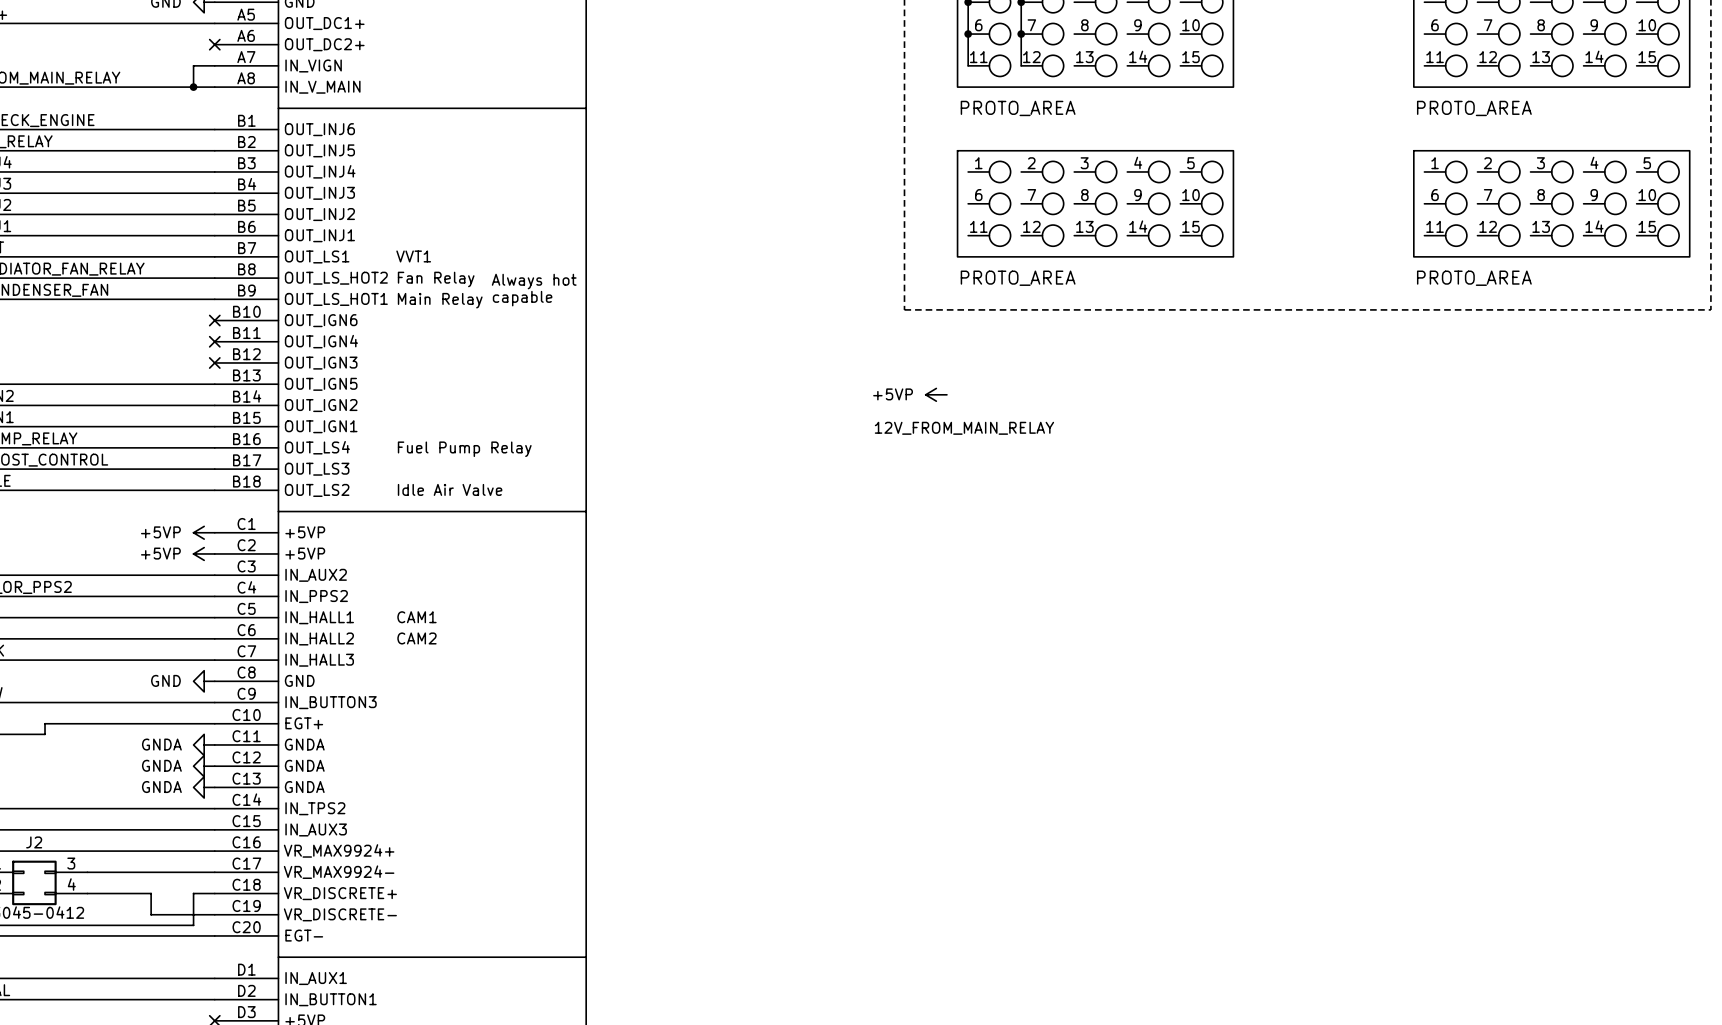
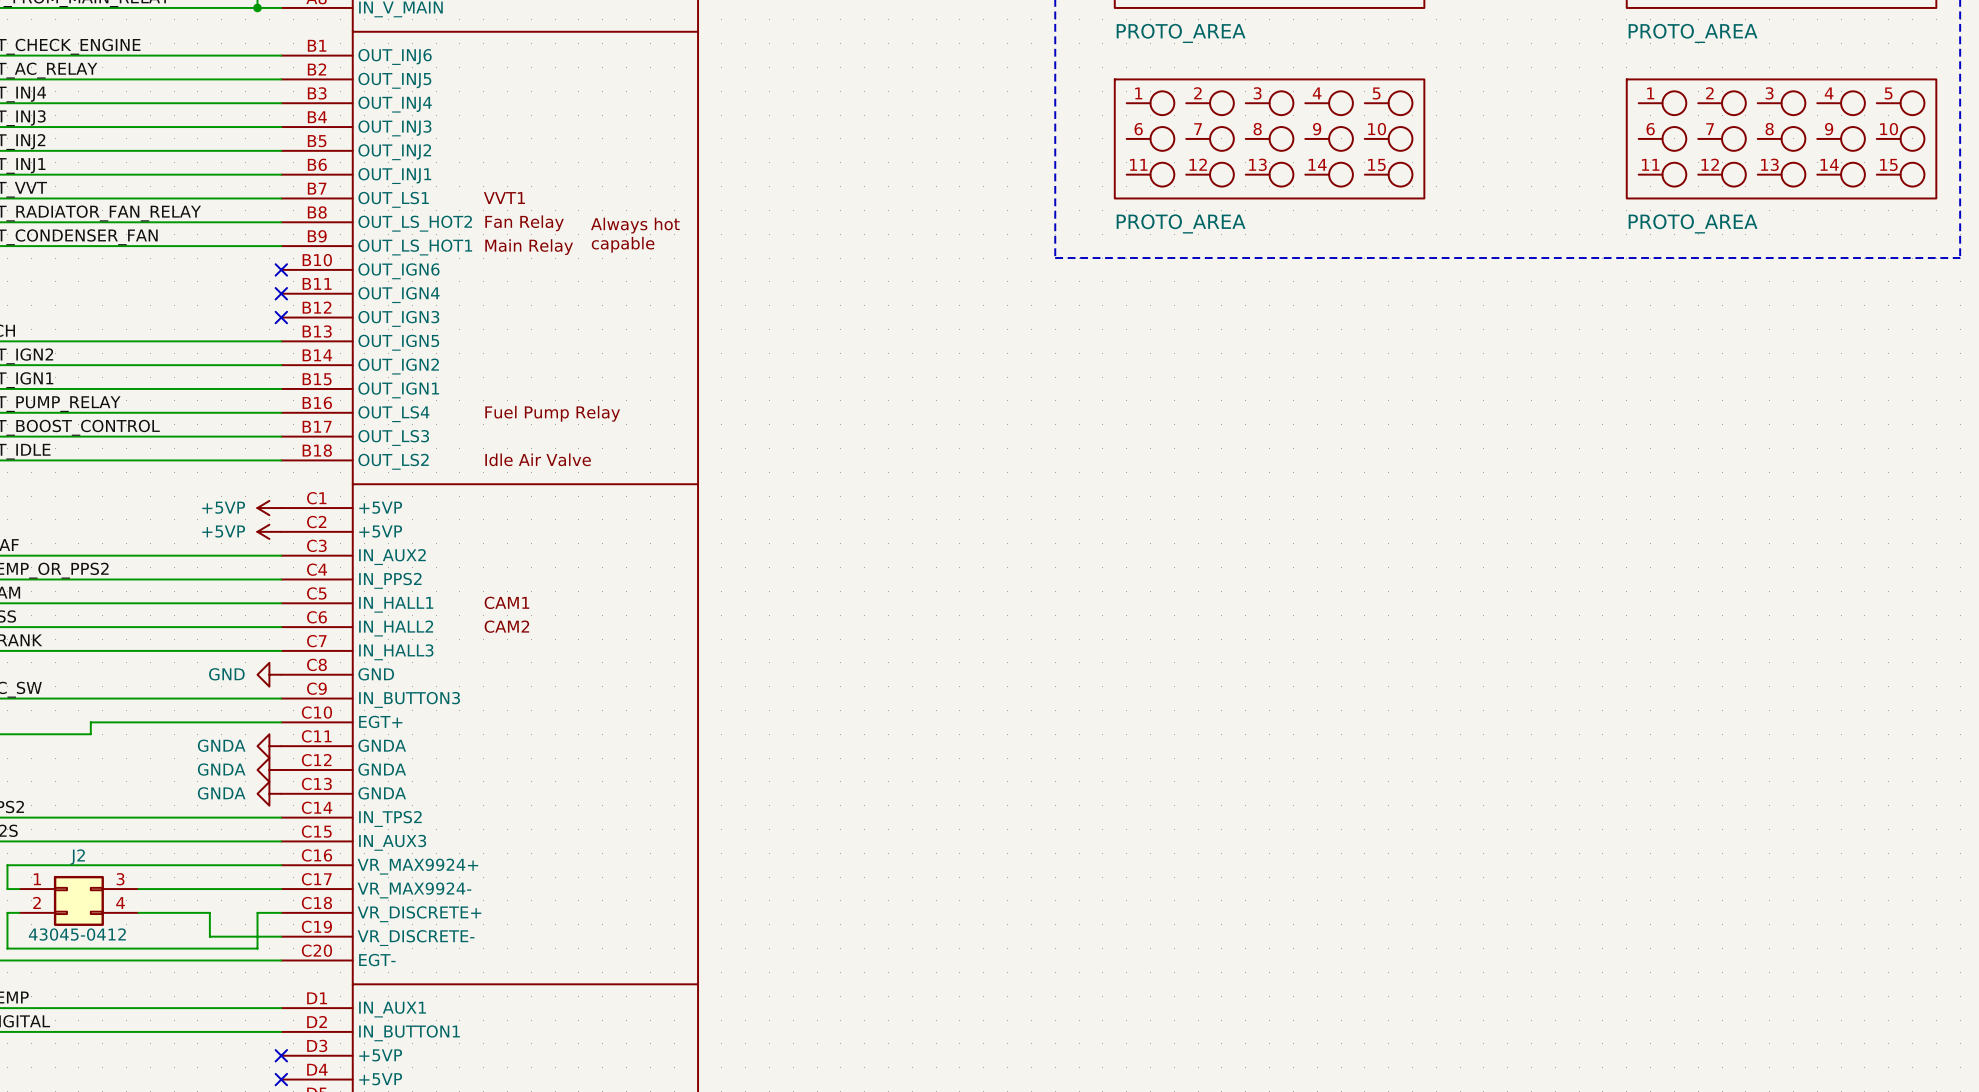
power symbol: +5VP (936, 394) -> none
label: 12V_FROM_MAIN_RELAY (964, 428) -> none

